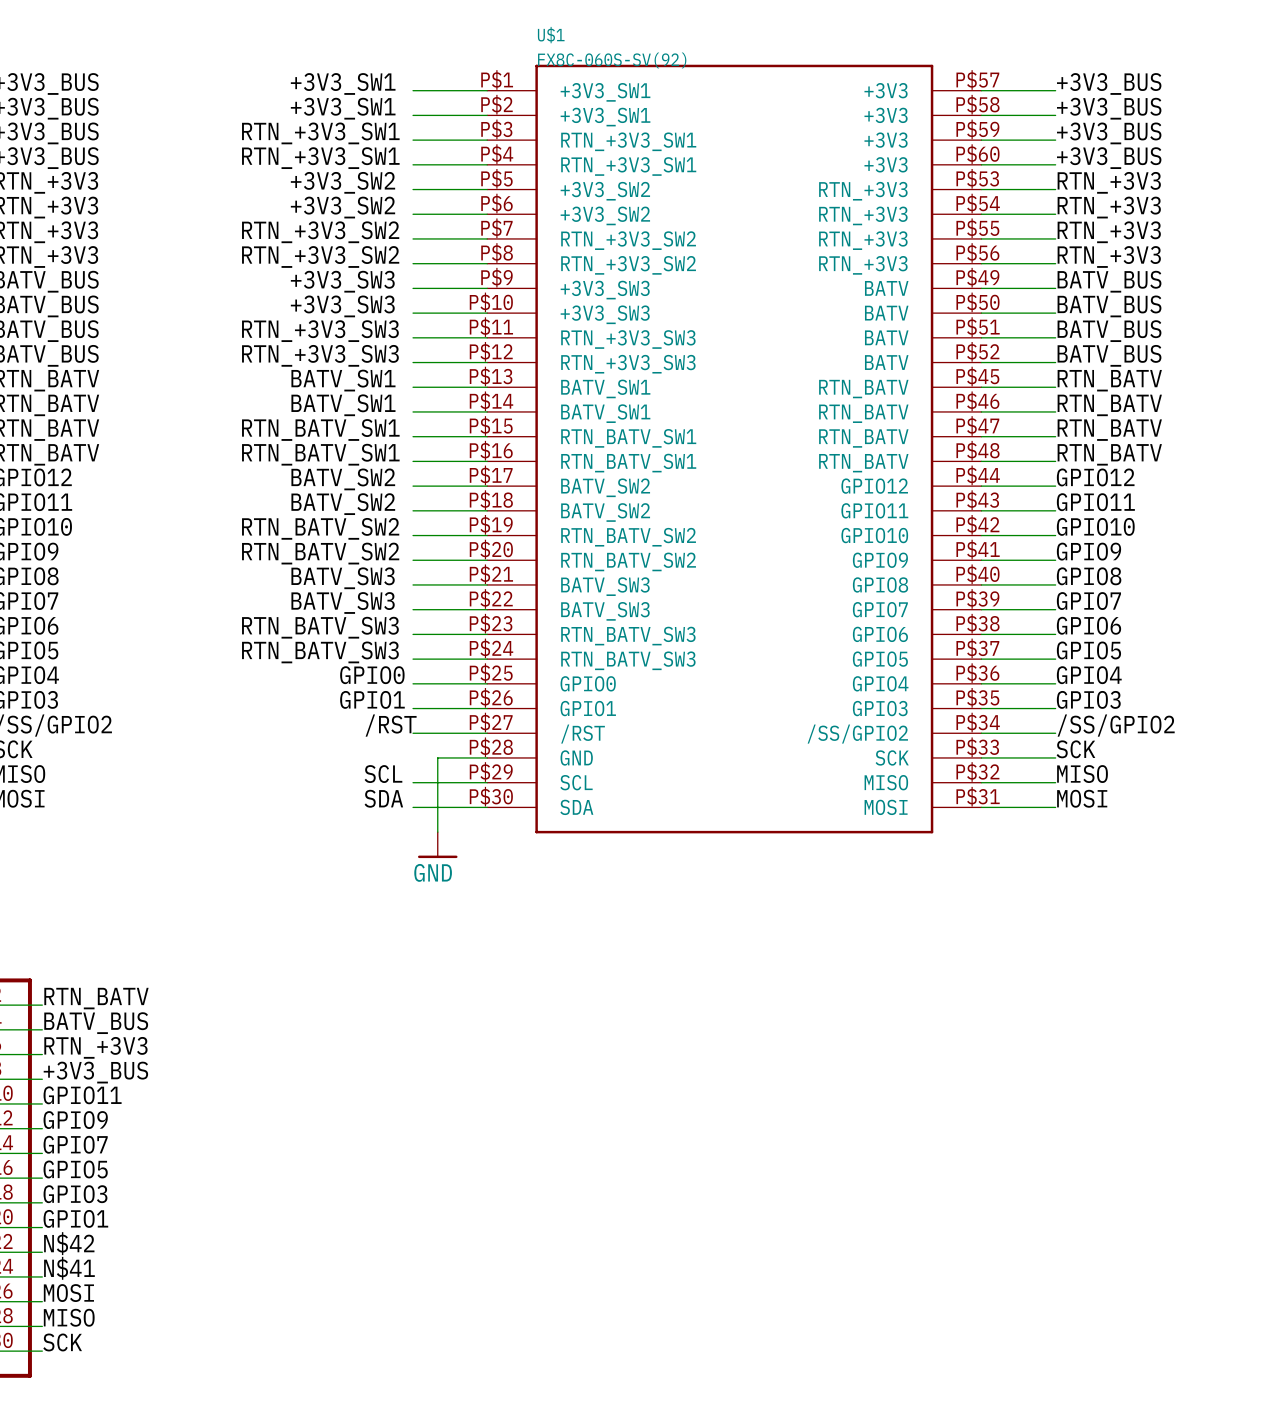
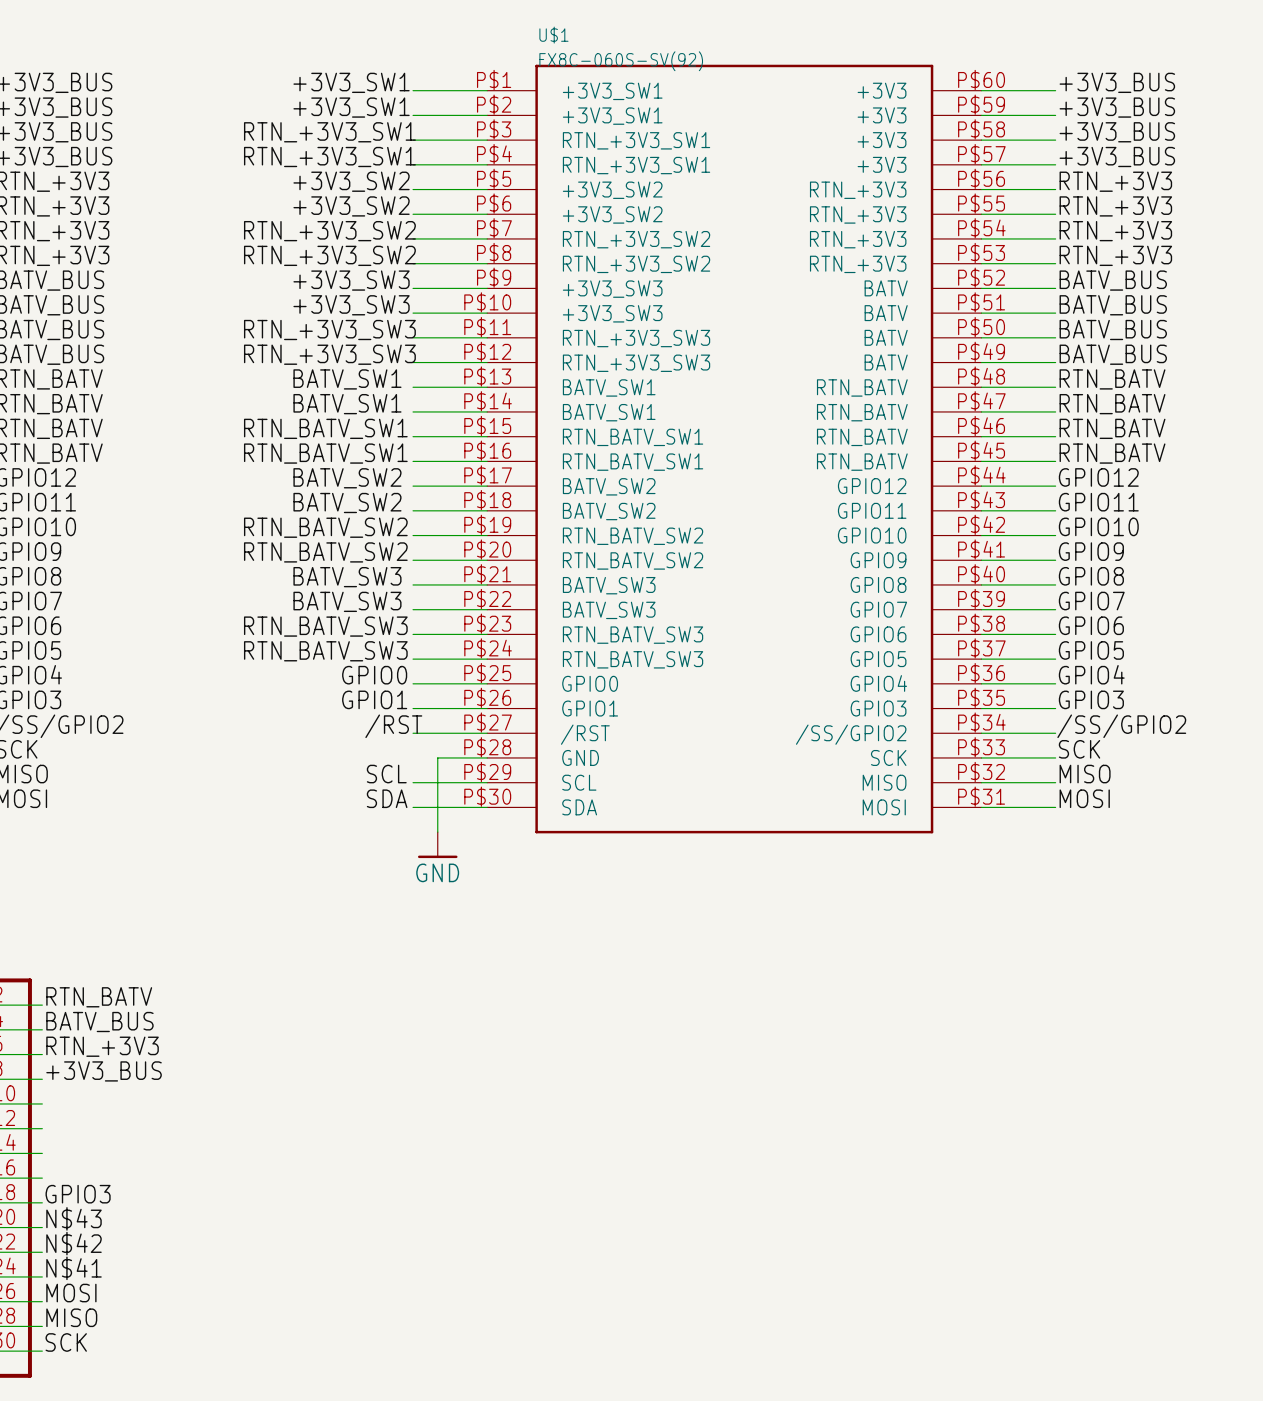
U$1 symbol: [487, 64, 982, 834] -> [487, 64, 982, 834]
label: GPIO11 (82, 1095) -> none
label: GPIO9 (75, 1120) -> none
label: GPIO7 (75, 1144) -> none
label: GPIO5 (75, 1169) -> none
label: GPIO1 (75, 1218) -> N$43 (74, 1218)

